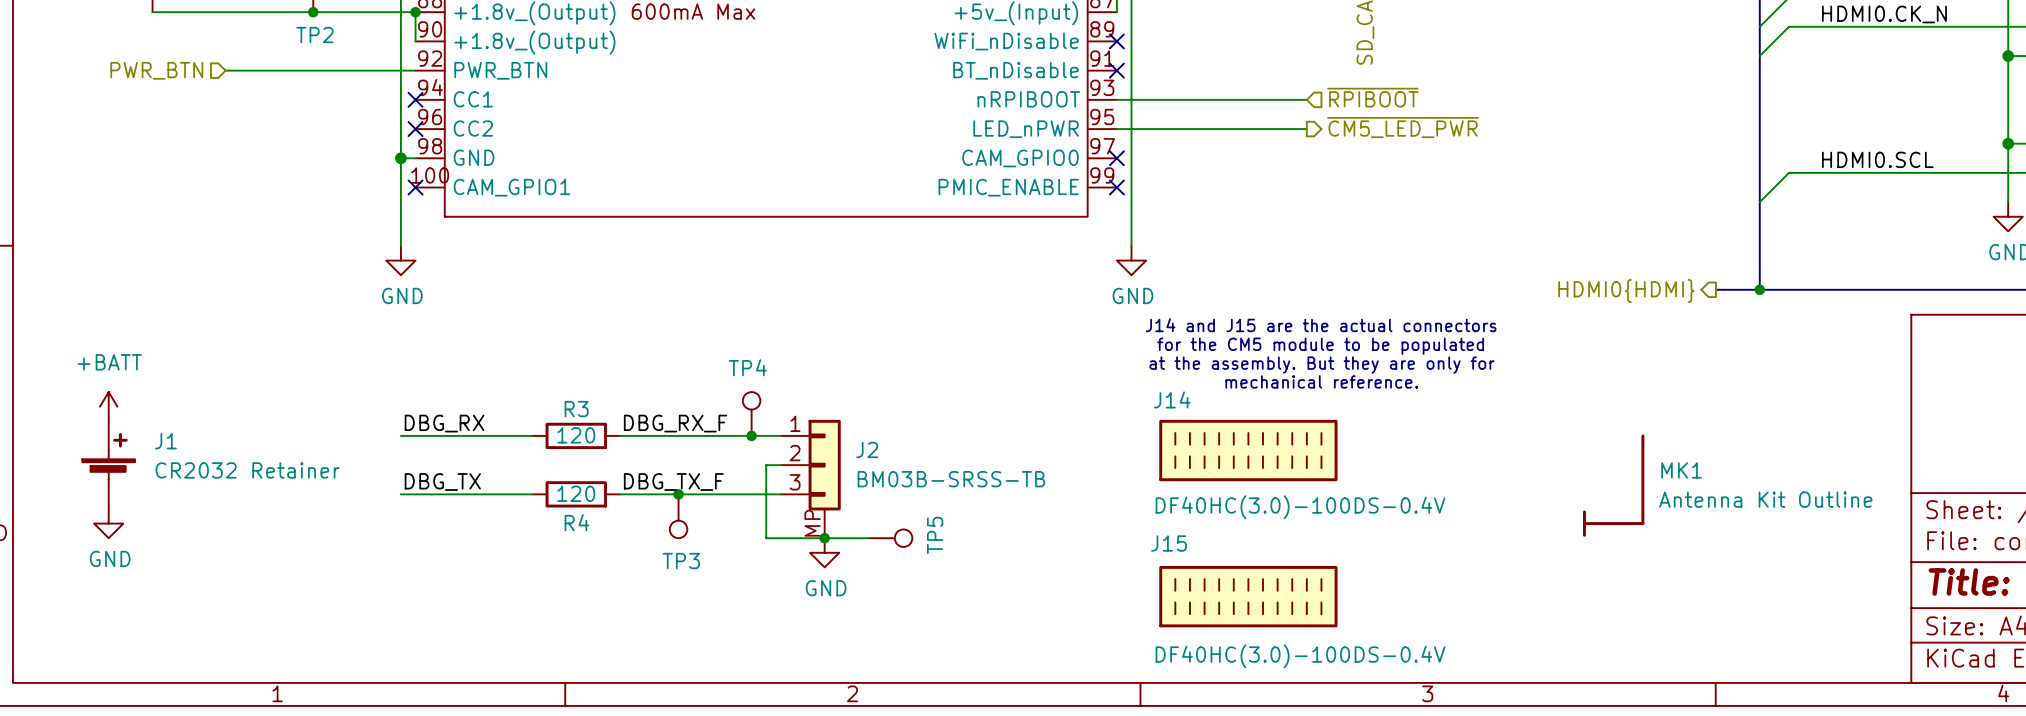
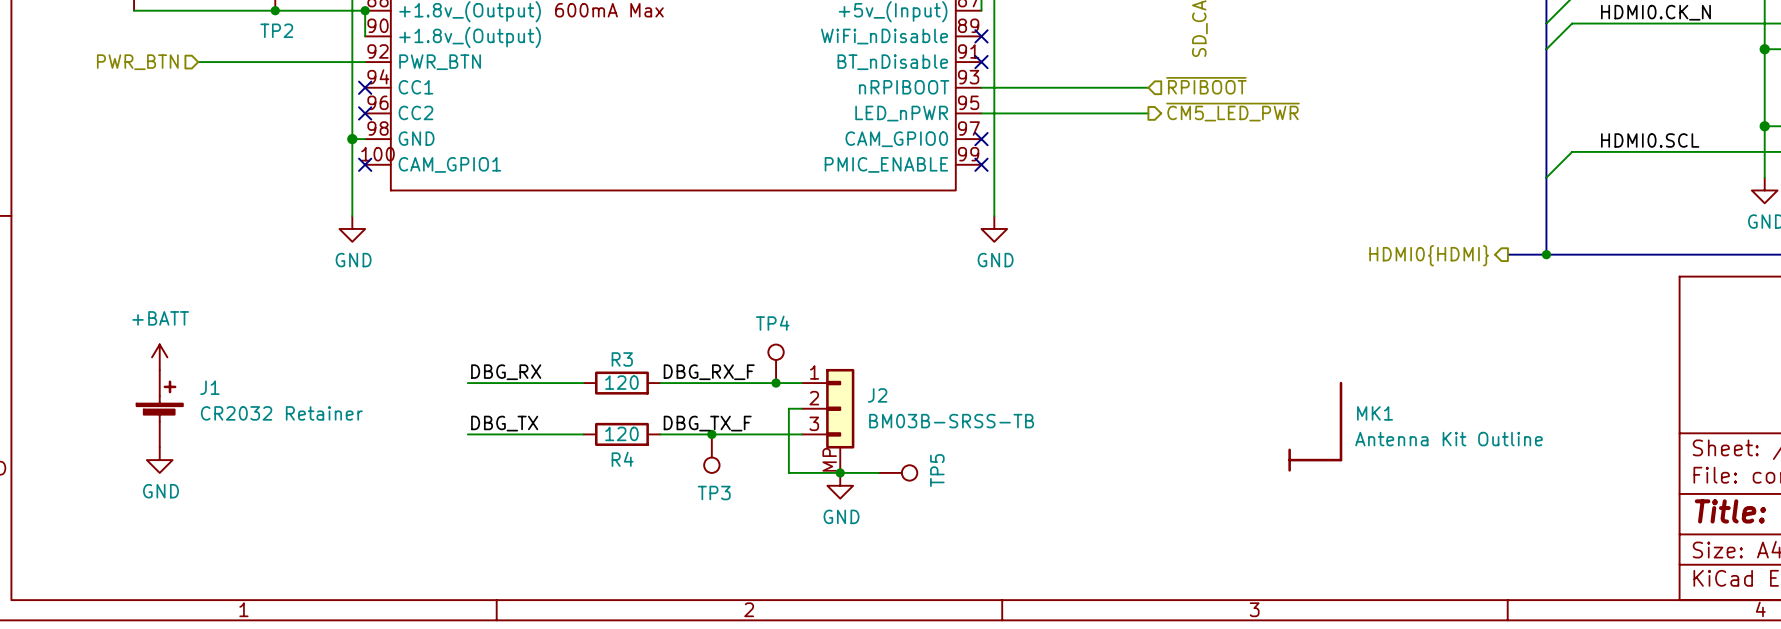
text: J14 and J15 are the actual connectors (1321, 325) -> none
text: for the CM5 module to be populated (1320, 346) -> none
text: at the assembly. But they are only for (1322, 365) -> none
text: mechanical reference. (1321, 381) -> none
power symbol position: +BATT (108, 406) -> +BATT (159, 357)
TP4 position: (751, 413) -> (776, 363)
label position: DBG_RX (444, 423) -> DBG_RX (506, 372)
label position: DBG_RX_F (675, 423) -> DBG_RX_F (709, 372)
wire: (400, 435) (532, 435) -> (544, 383) (467, 383)
R3 position: (576, 435) -> (621, 383)
wire: (663, 435) (751, 435) -> none
junction: (751, 435) -> none
wire: none -> (686, 383) (801, 383)
junction: none -> (776, 383)
J14: DF40HC(3.0)-100DS-0.4V (1248, 450) -> none
J1 position: (108, 465) -> (159, 408)
wire: (780, 465) (766, 465) (766, 538) (868, 538) -> (801, 408) (788, 408) (788, 472) (878, 472)
J2 position: (810, 479) -> (828, 420)
label position: DBG_TX (442, 482) -> DBG_TX (504, 423)
label position: DBG_TX_F (673, 482) -> DBG_TX_F (707, 423)
MK1 position: (1613, 485) -> (1315, 426)
wire: (400, 494) (532, 494) -> (544, 434) (467, 434)
R4 position: (576, 494) -> (621, 434)
wire: (663, 494) (751, 494) -> none
junction: (678, 494) -> none
wire: none -> (686, 434) (801, 434)
junction: none -> (711, 434)
TP3 position: (678, 516) -> (711, 453)
power symbol position: GND (108, 523) -> GND (159, 460)
junction: (824, 538) -> none
TP5 position: (890, 538) -> (898, 472)
junction: none -> (840, 472)
power symbol position: GND (824, 552) -> GND (840, 485)
J15: DF40HC(3.0)-100DS-0.4V (1248, 596) -> none

